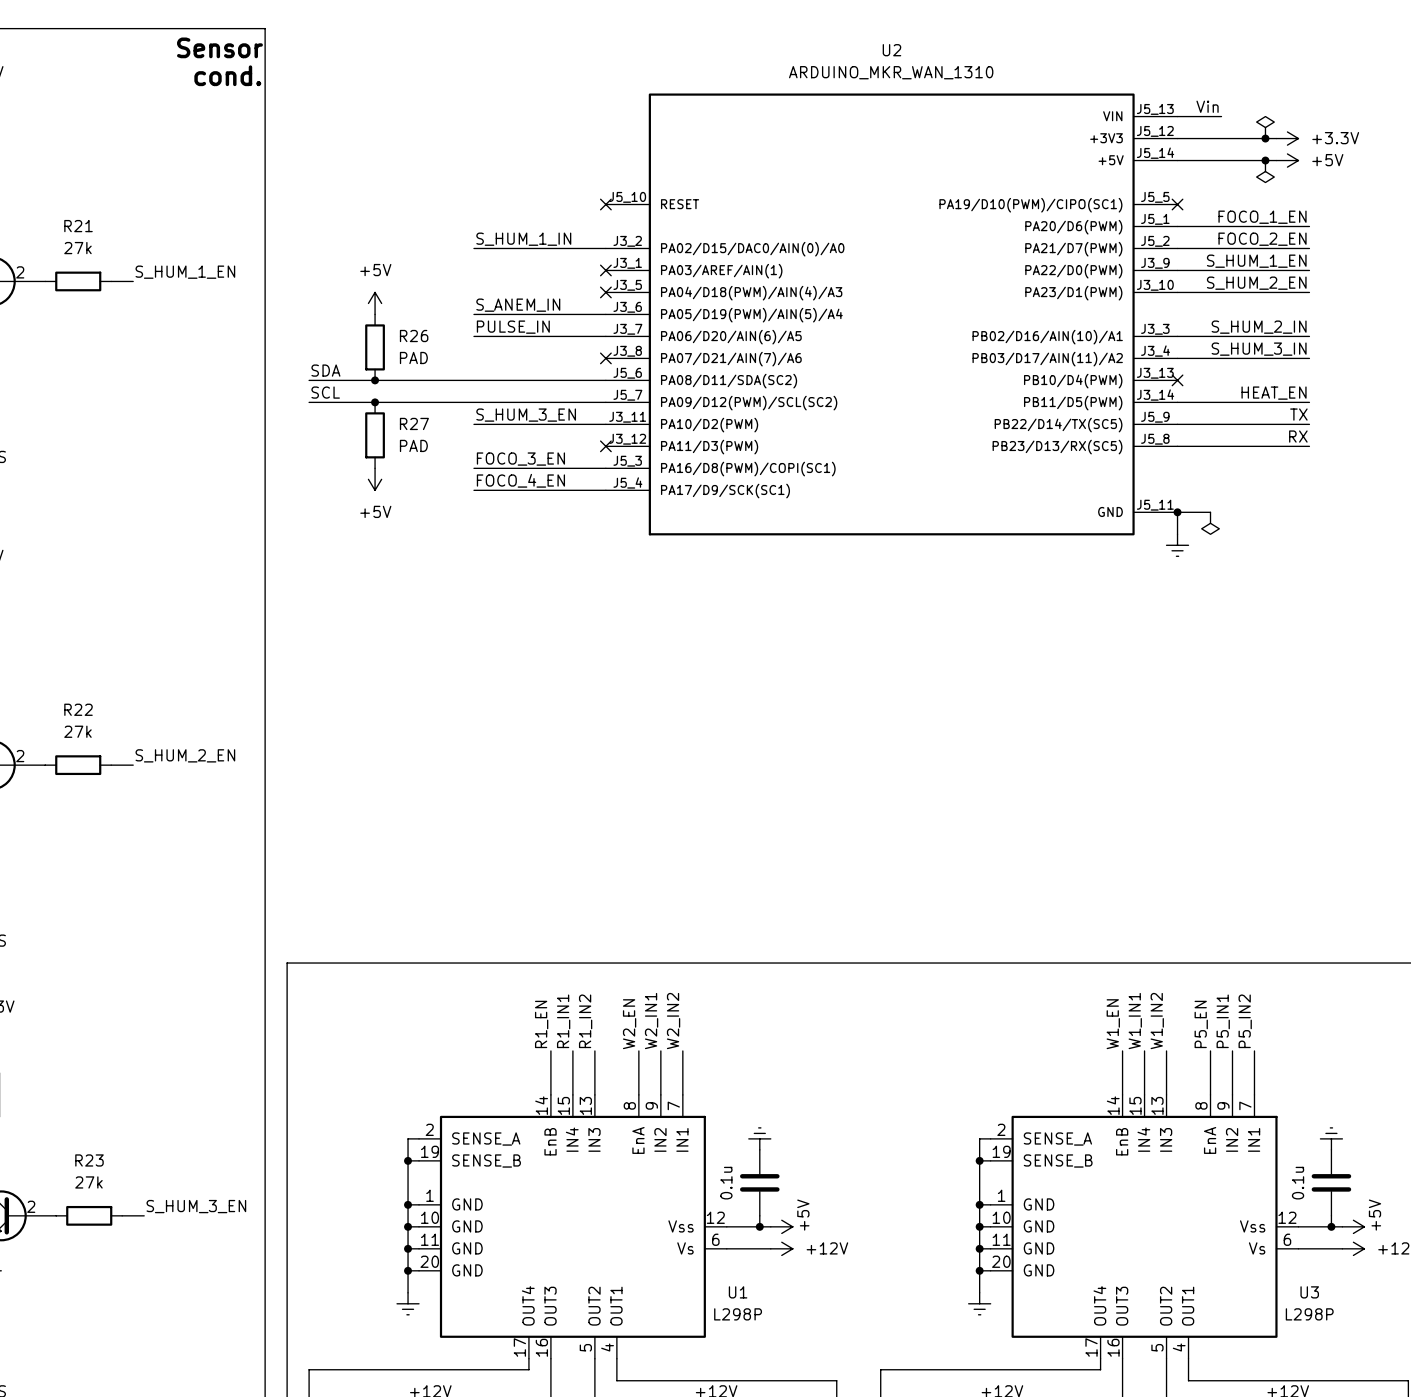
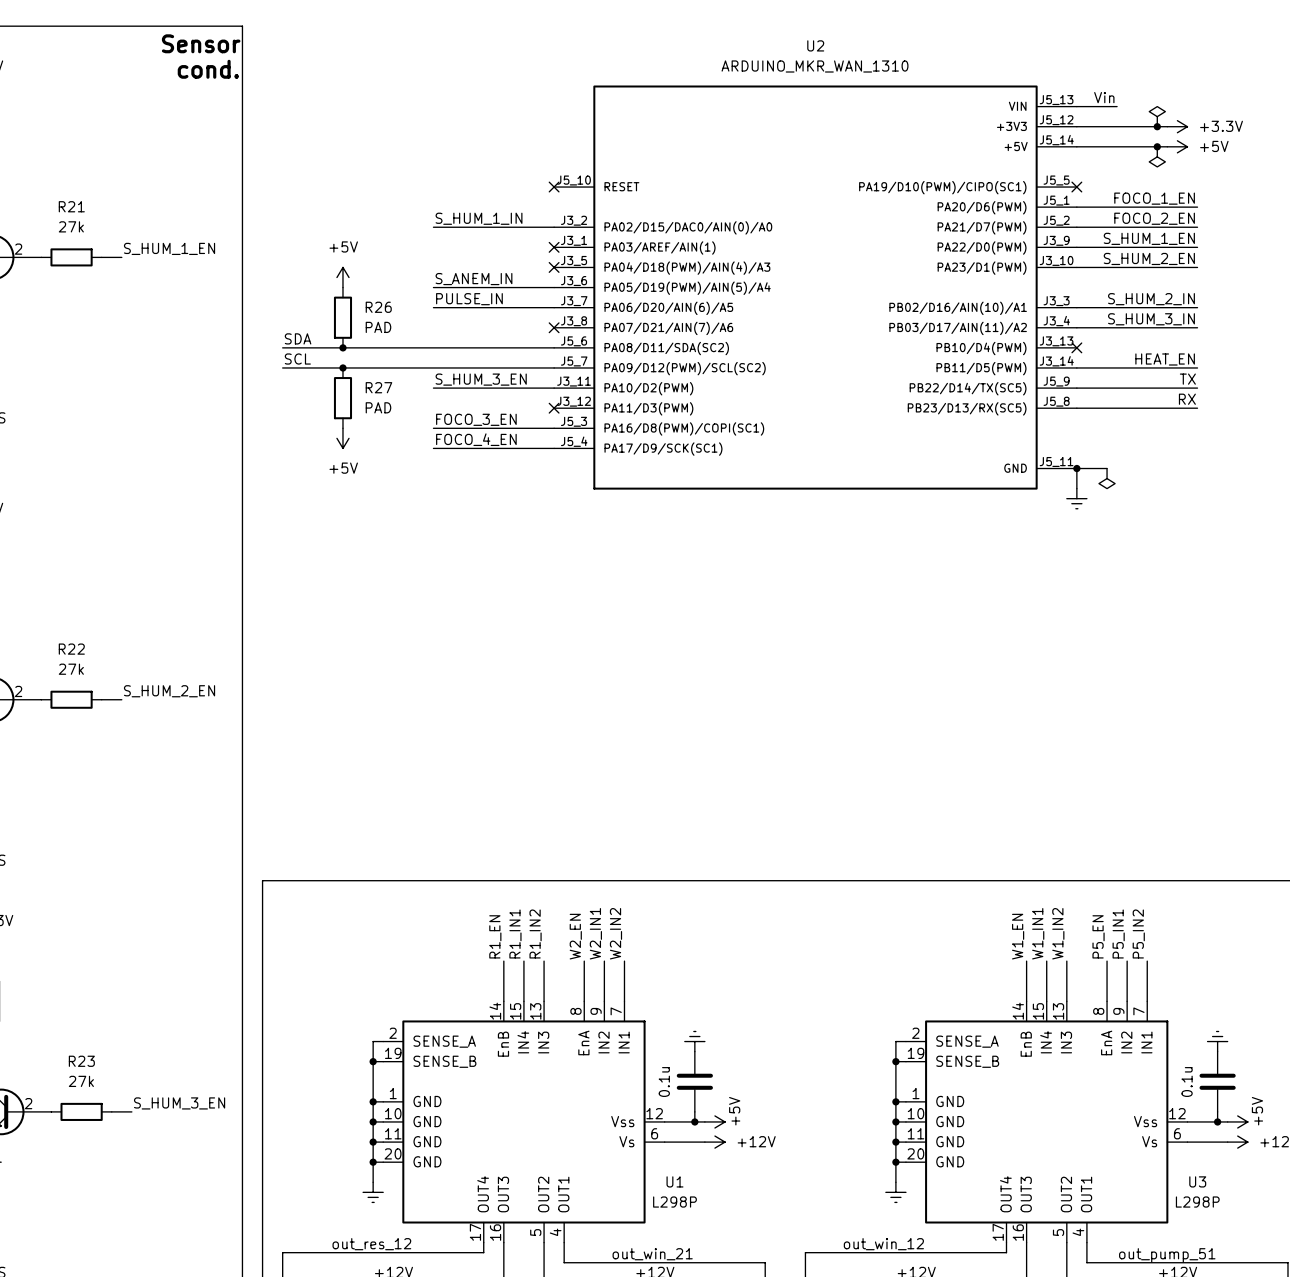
label: none -> out_res_12 (371, 1244)
label: none -> out_win_12 (883, 1244)
label: none -> out_win_21 (652, 1254)
label: none -> out_pump_51 (1167, 1255)

